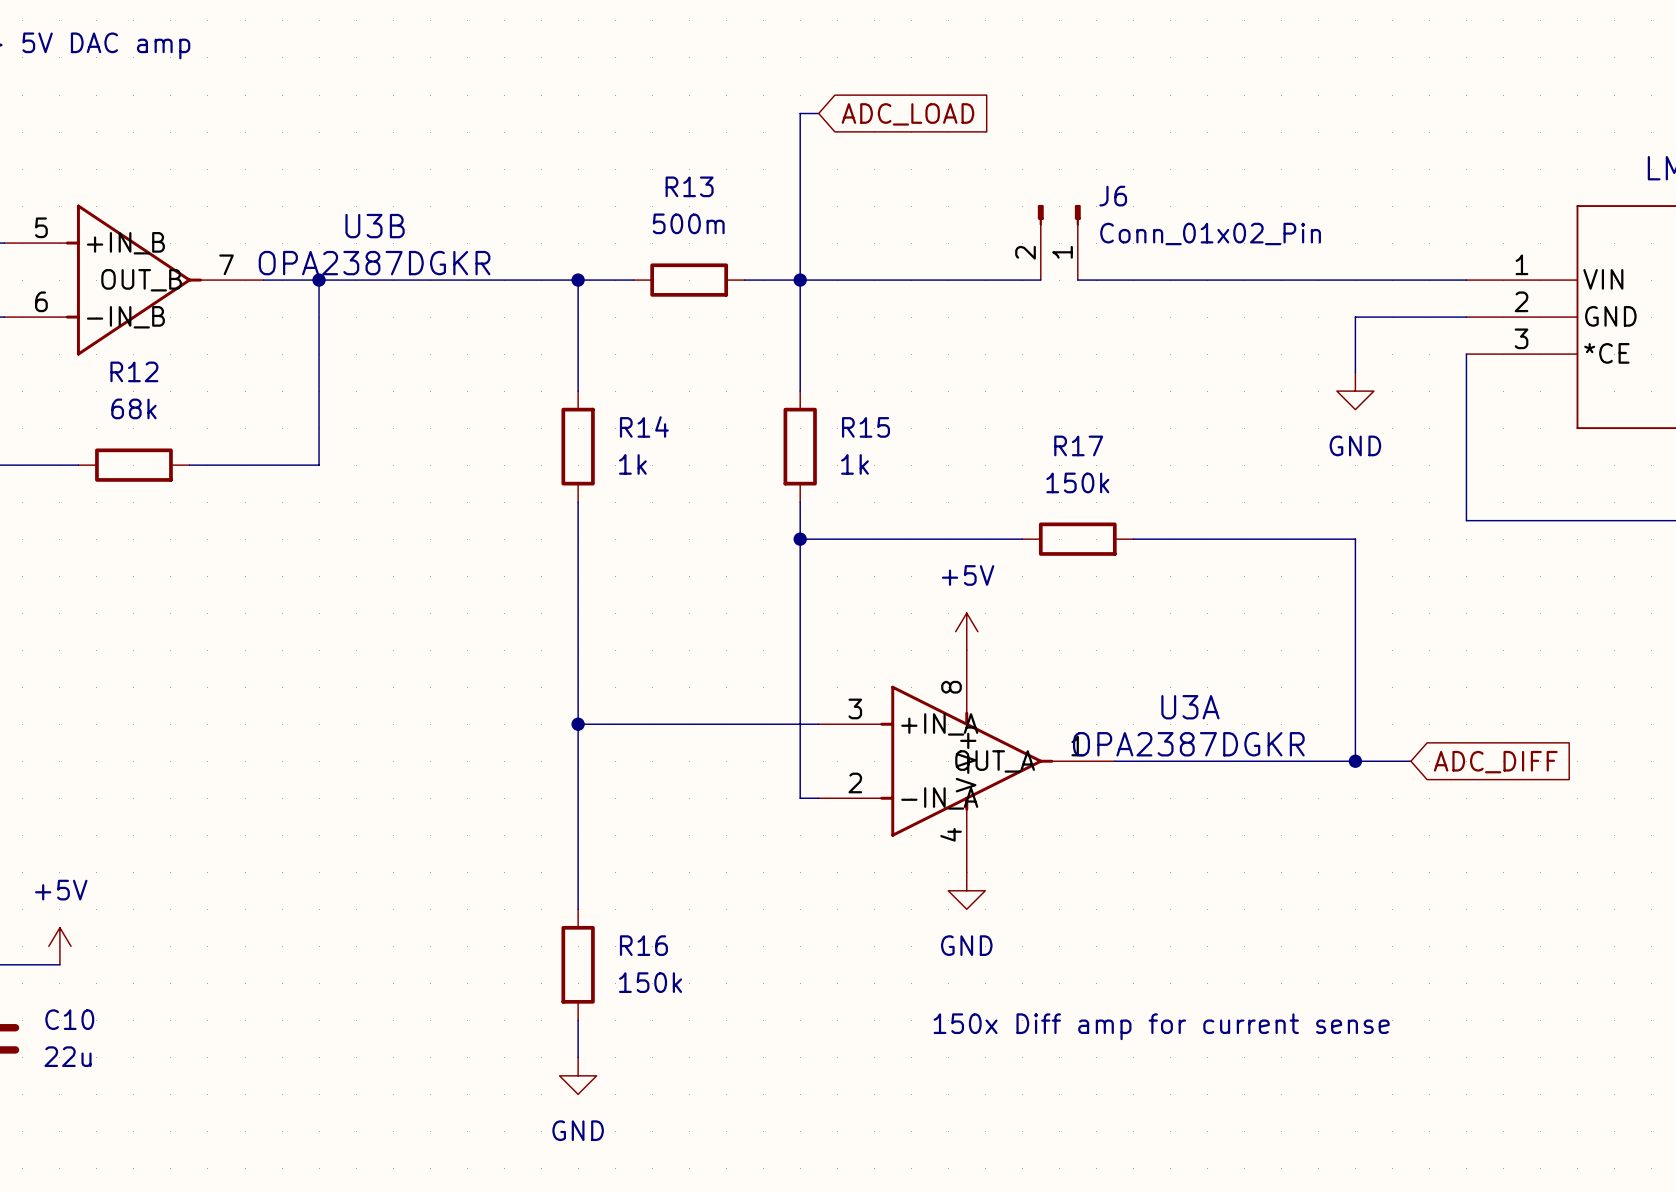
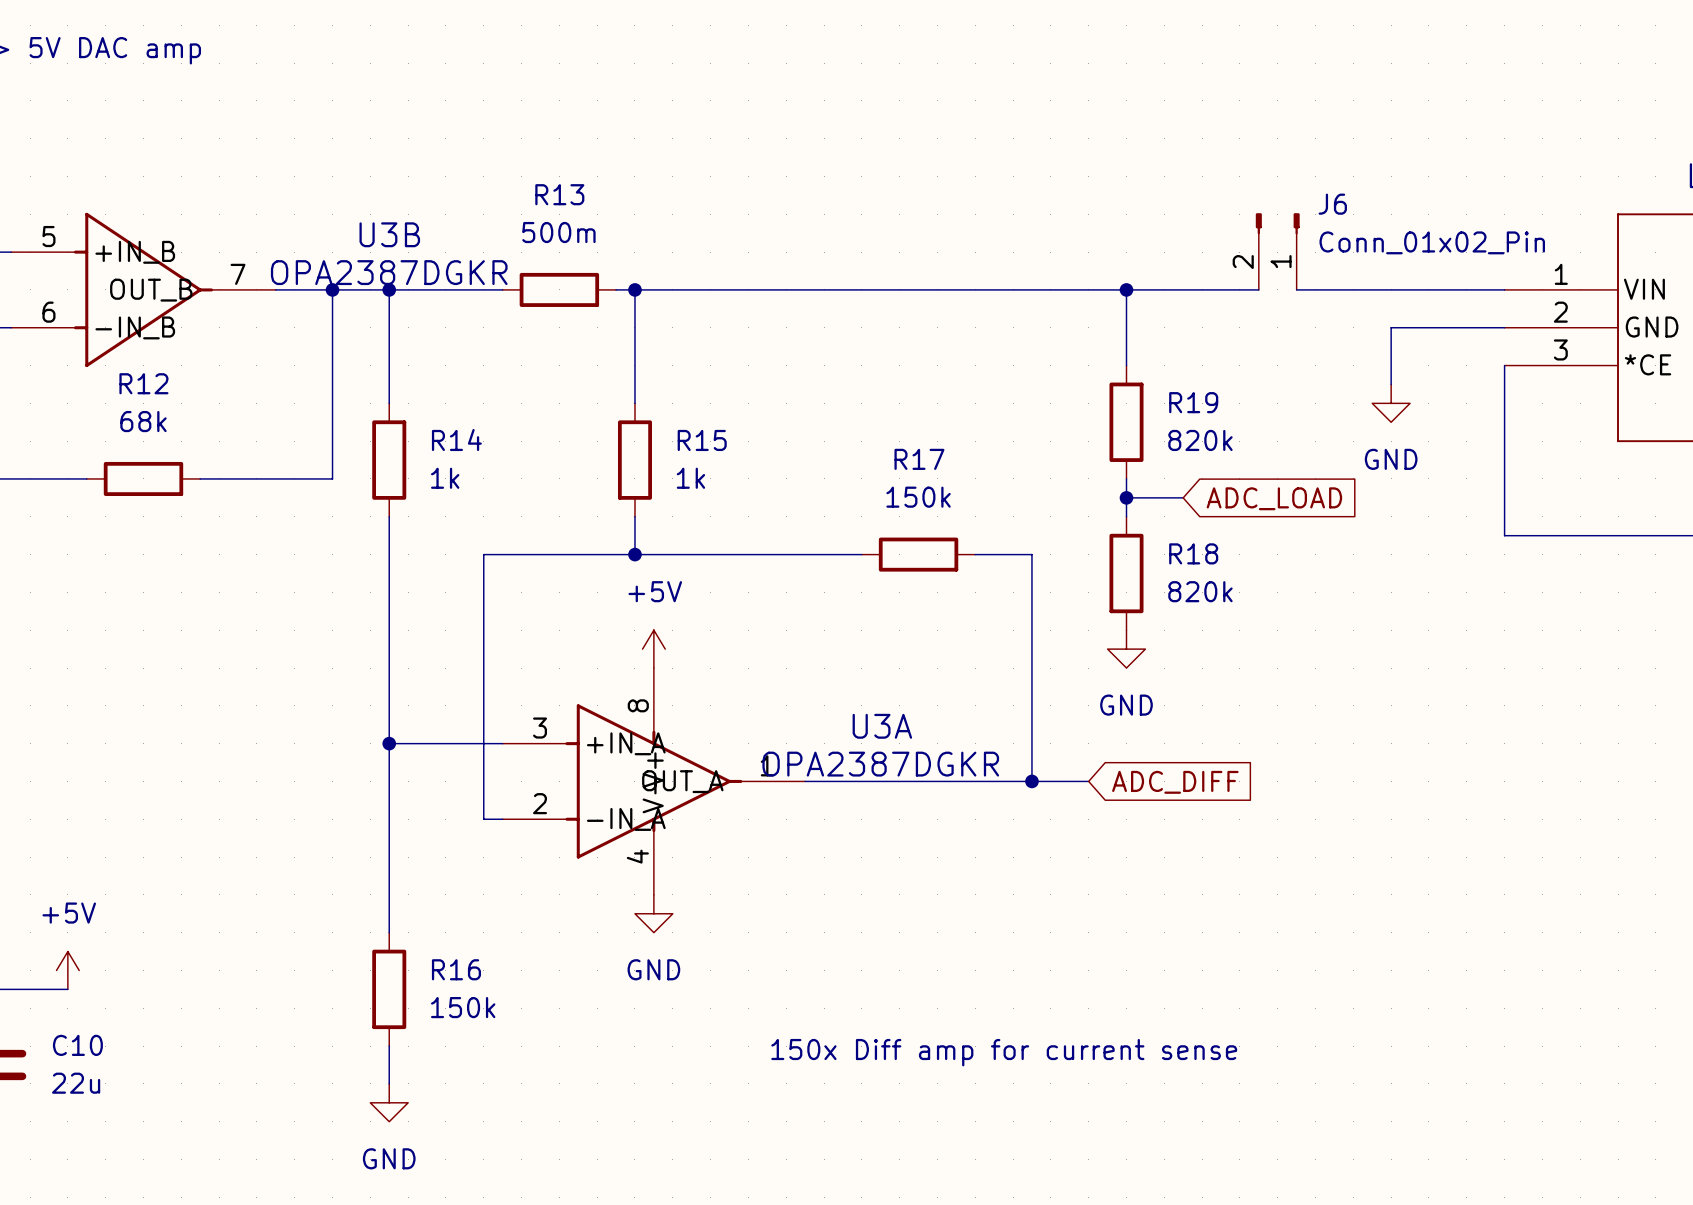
wire: (818, 113) (800, 113) (800, 391) -> none
global label: ADC_LOAD (907, 114) -> none
J6 position: (1059, 242) -> (1277, 251)
junction: none -> (389, 289)
wire: (485, 280) (596, 280) -> (653, 289) (767, 289)
wire: (578, 280) (578, 391) -> (389, 289) (389, 403)
junction position: (578, 280) -> (634, 289)
wire: none -> (634, 289) (634, 403)
R13 position: (689, 280) -> (559, 289)
junction: (800, 280) -> none
wire: none -> (1126, 289) (1126, 365)
junction: none -> (1126, 289)
wire: (1225, 280) (1262, 280) -> (1069, 289) (1107, 289)
R19: none -> 820k (1126, 422)
R14 position: (578, 446) -> (389, 460)
R15 position: (800, 446) -> (634, 460)
wire: none -> (1126, 478) (1126, 516)
wire: none -> (1126, 497) (1183, 497)
junction: none -> (1126, 497)
global label: none -> ADC_LOAD (1274, 498)
wire: (578, 502) (578, 909) -> (389, 516) (389, 932)
wire: none -> (634, 516) (634, 554)
wire: (800, 502) (800, 798) (818, 798) -> none
junction: none -> (634, 554)
wire: none -> (824, 554) (483, 554) (483, 819) (502, 819)
junction: (800, 539) -> none
wire: (837, 539) (948, 539) -> none
wire: (1003, 539) (1022, 539) -> (1031, 554) (1031, 781)
R17 position: (1077, 539) -> (918, 554)
wire: (1133, 539) (1355, 539) (1355, 761) -> none
R18: none -> 820k (1126, 573)
power symbol position: +5V (966, 631) -> +5V (653, 649)
power symbol: none -> GND (1126, 649)
wire: none -> (389, 743) (502, 743)
junction: none -> (389, 743)
wire: (578, 724) (818, 724) -> none
junction: (578, 724) -> none
wire: none -> (805, 781) (1088, 781)
U3A position: (966, 761) -> (653, 781)
junction: none -> (1031, 781)
wire: (1114, 761) (1410, 761) -> none
junction: (1355, 761) -> none
global label position: ADC_DIFF (1495, 762) -> ADC_DIFF (1175, 782)
power symbol: none -> GND (653, 913)
power symbol: GND (966, 890) -> none
R16 position: (578, 964) -> (389, 989)
wire: (578, 1020) (578, 1057) -> (389, 1046) (389, 1083)
text position: 150x Diff amp for current sense (1161, 1026) -> 150x Diff amp for current sense (1004, 1052)
power symbol: none -> GND (389, 1102)
power symbol: GND (578, 1075) -> none

